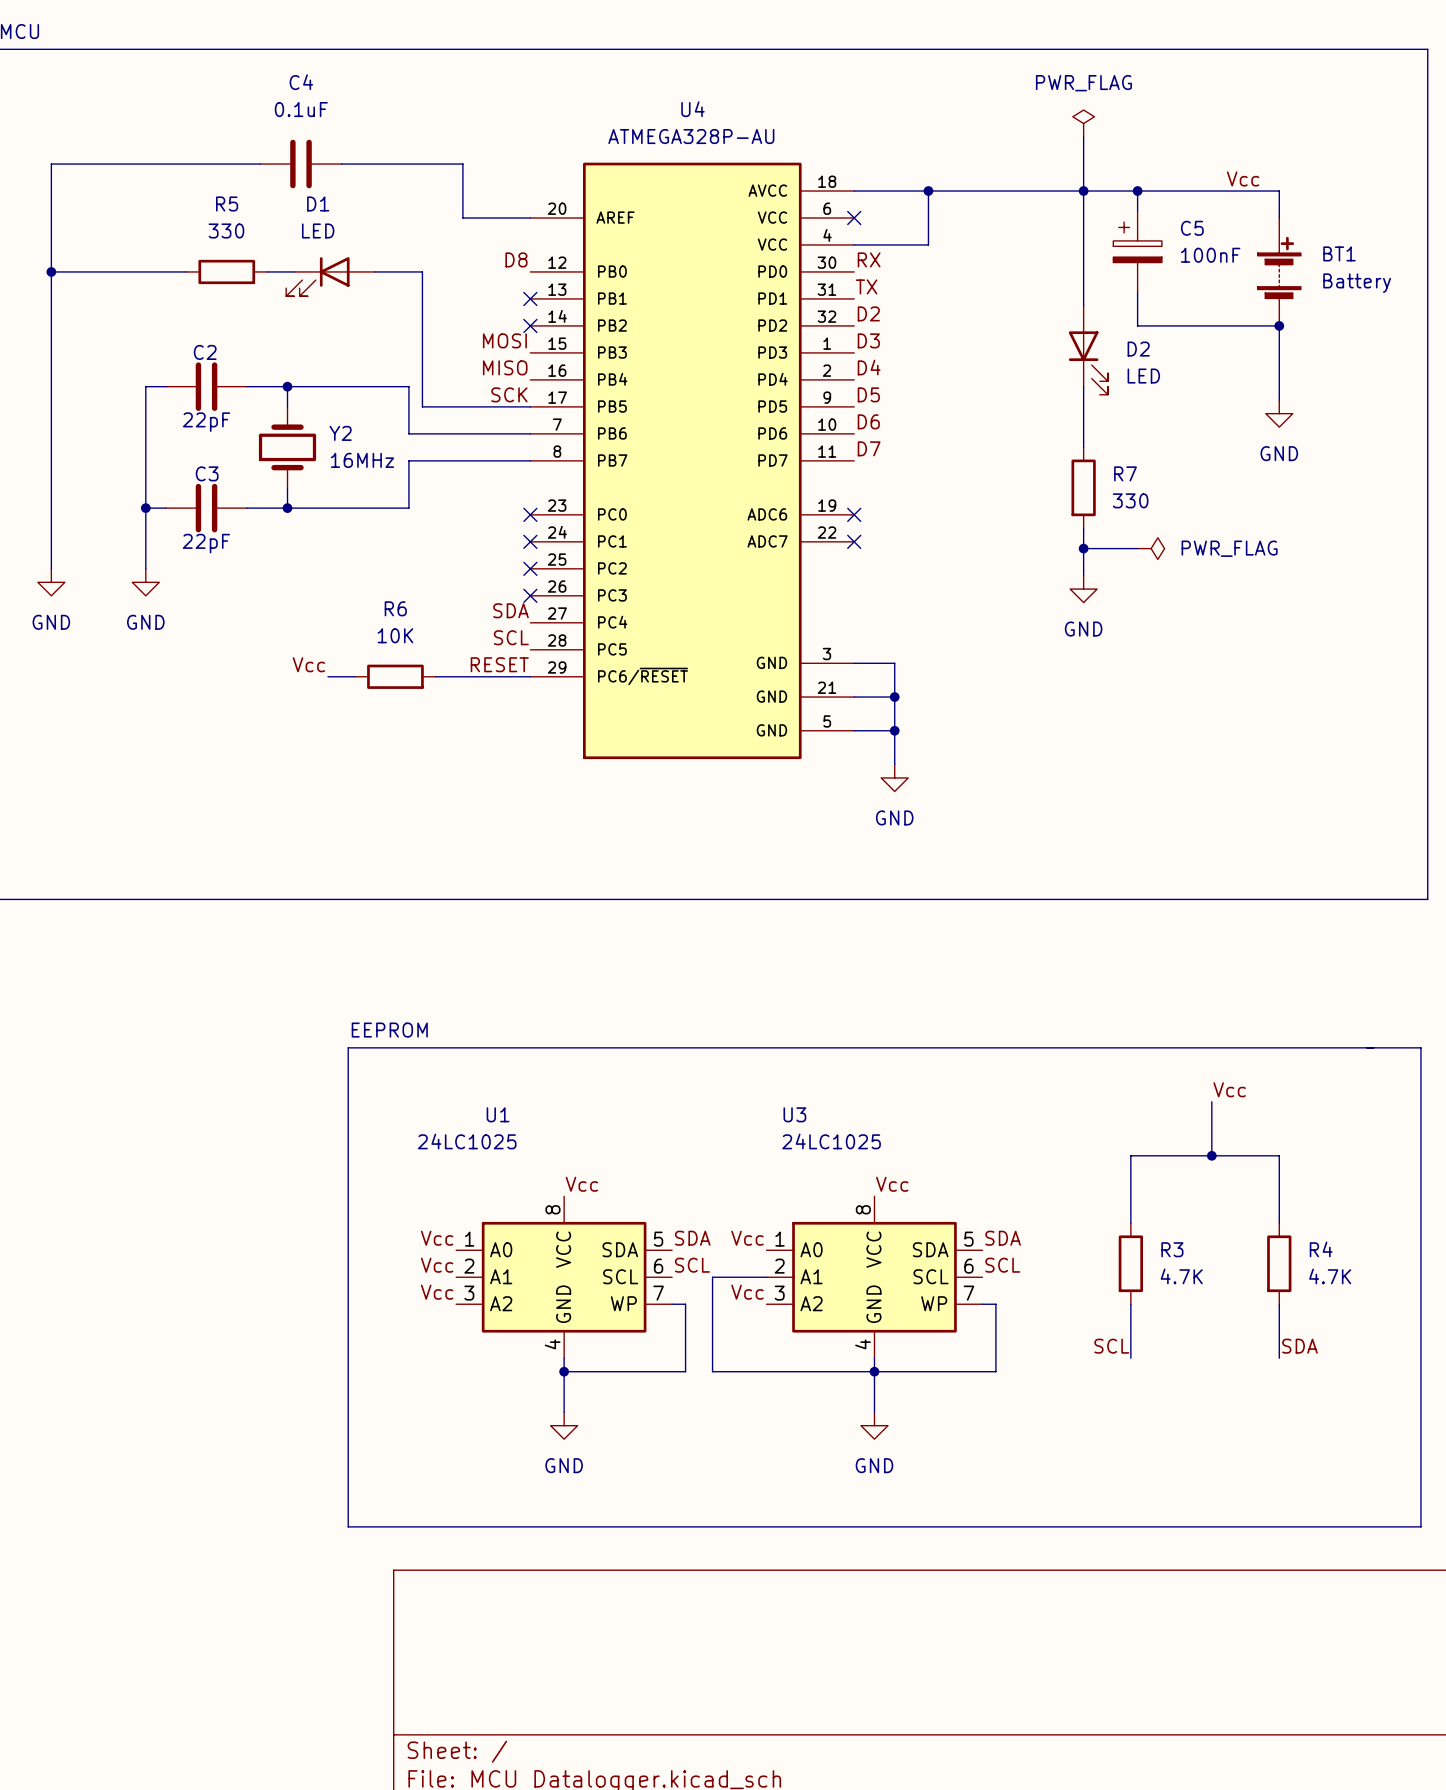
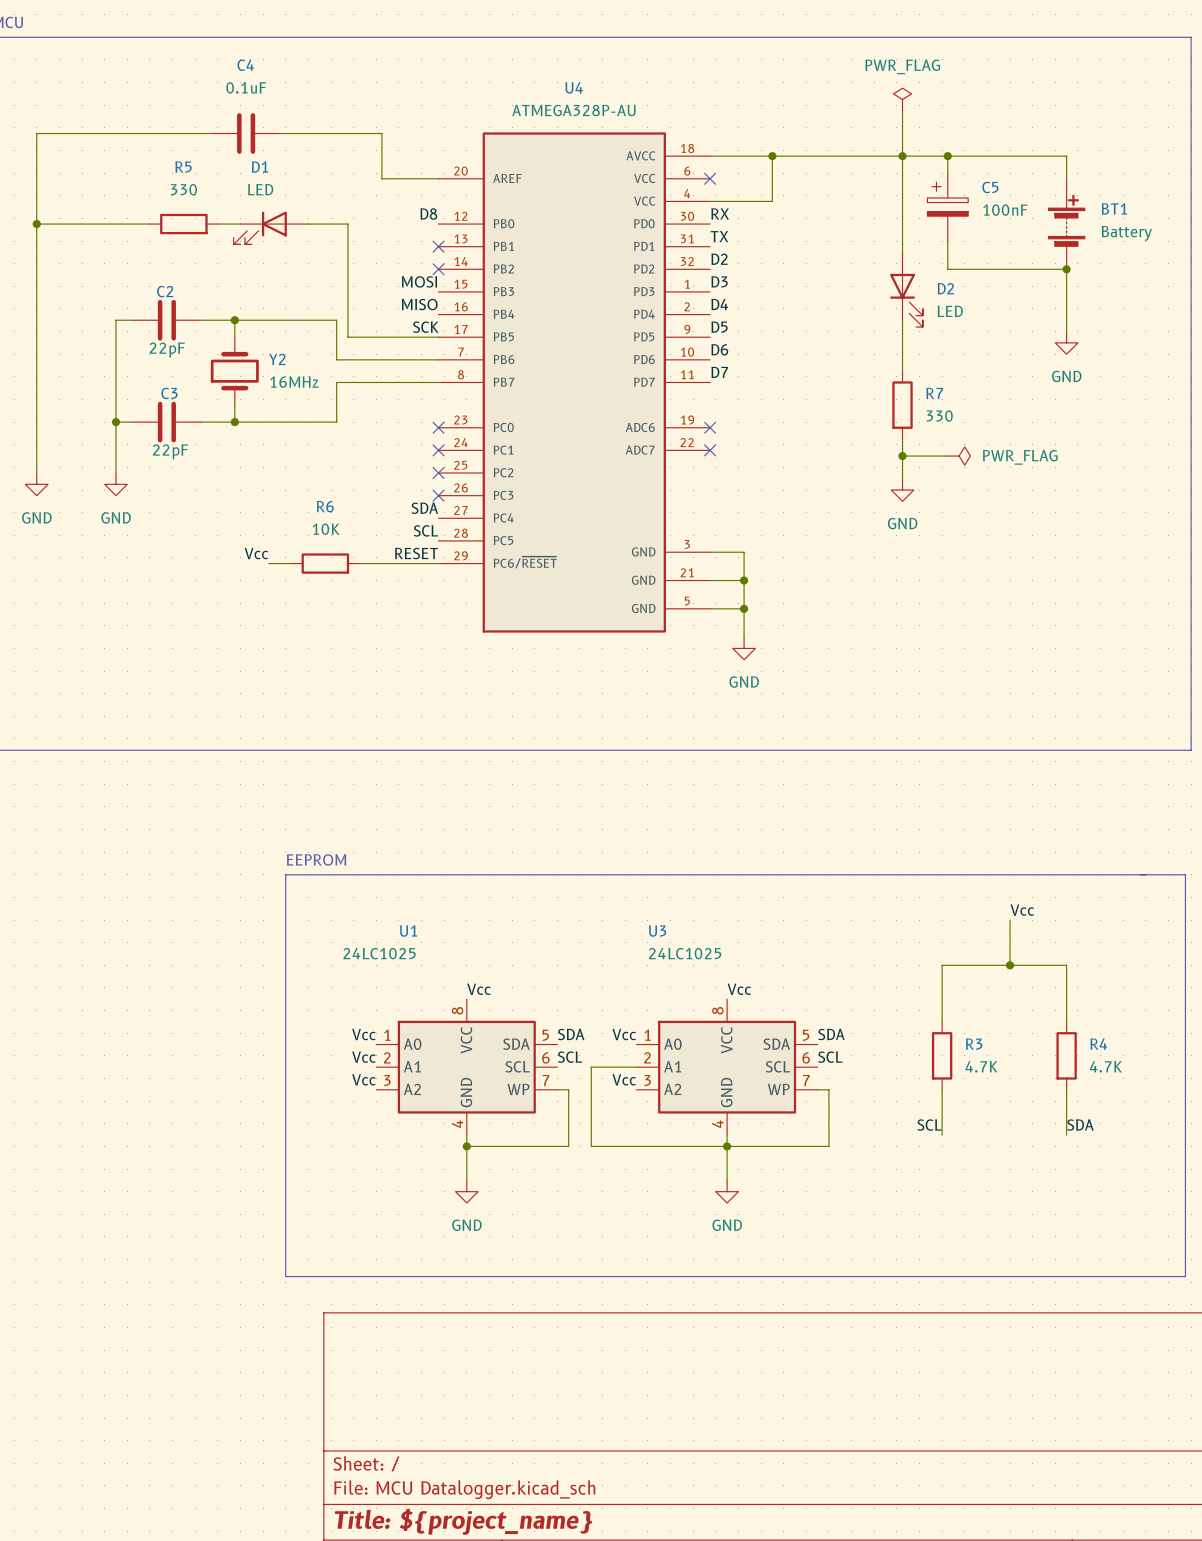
label: Vcc (1243, 178) -> none

